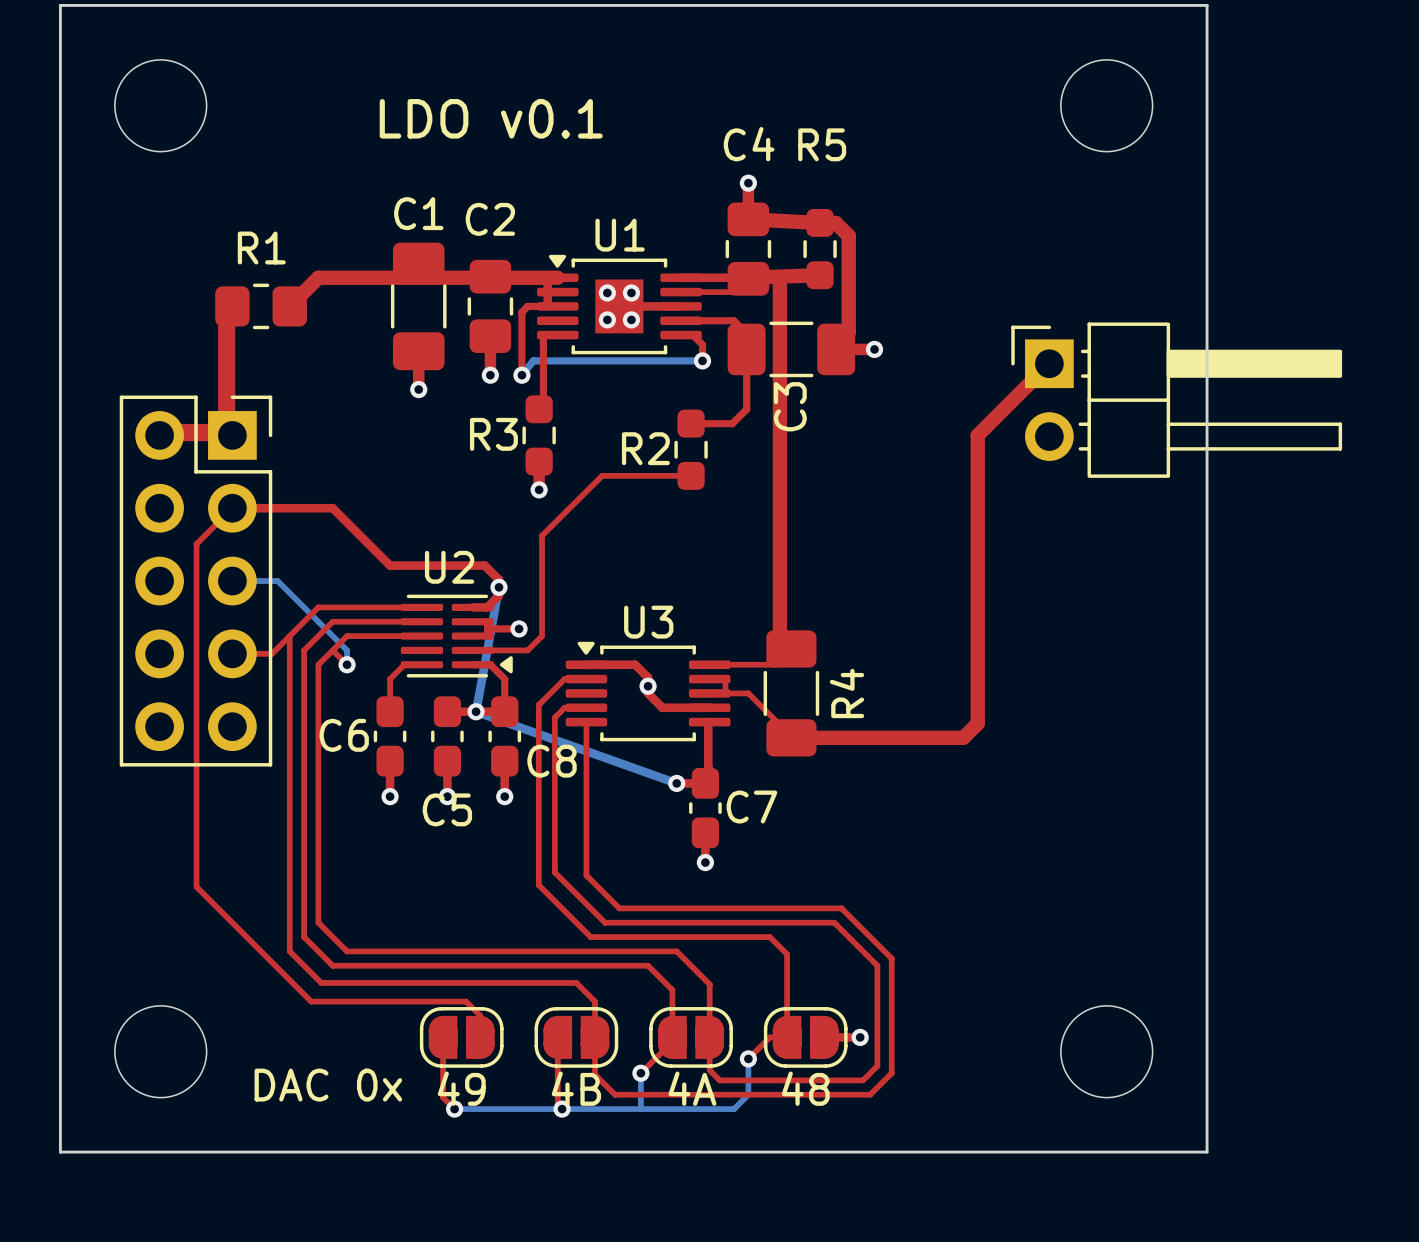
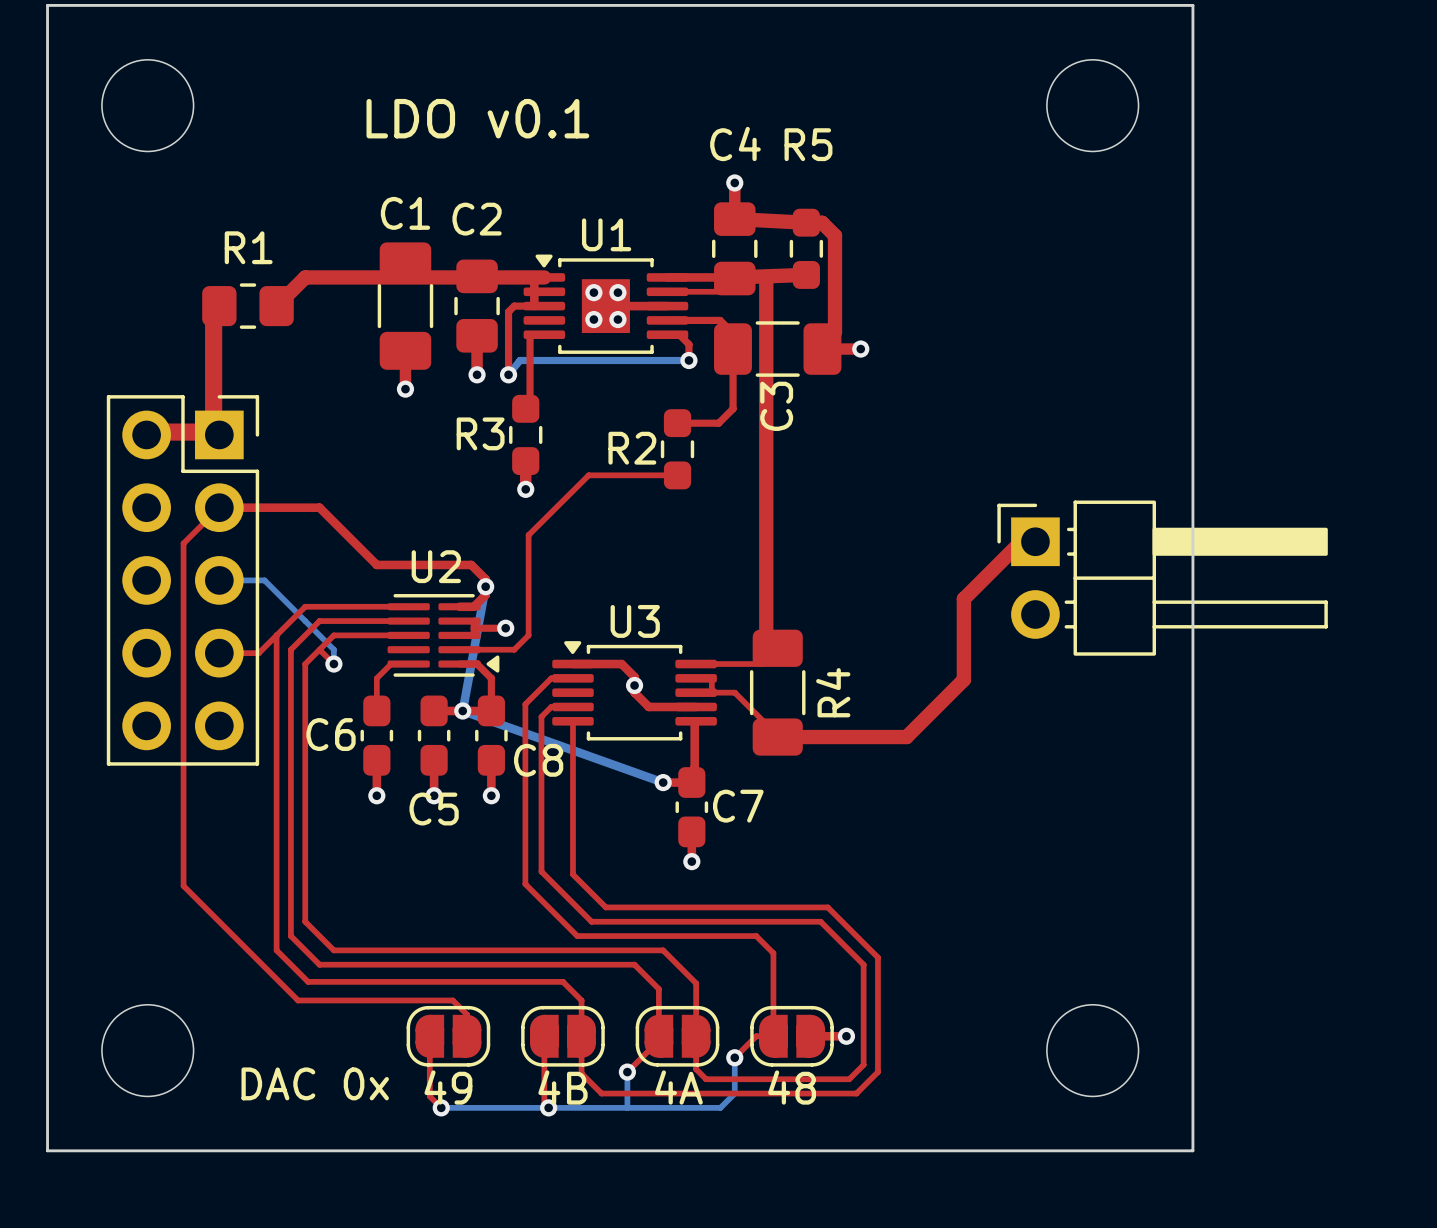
top track: (1049, 363) (977, 435) (977, 599) -> (1035, 541) (1021, 541) (963, 599)
part position: (1176, 400) -> (1162, 578)
top track: (977, 680) (977, 723) (963, 737) (920, 737) -> (963, 679) (906, 737)

